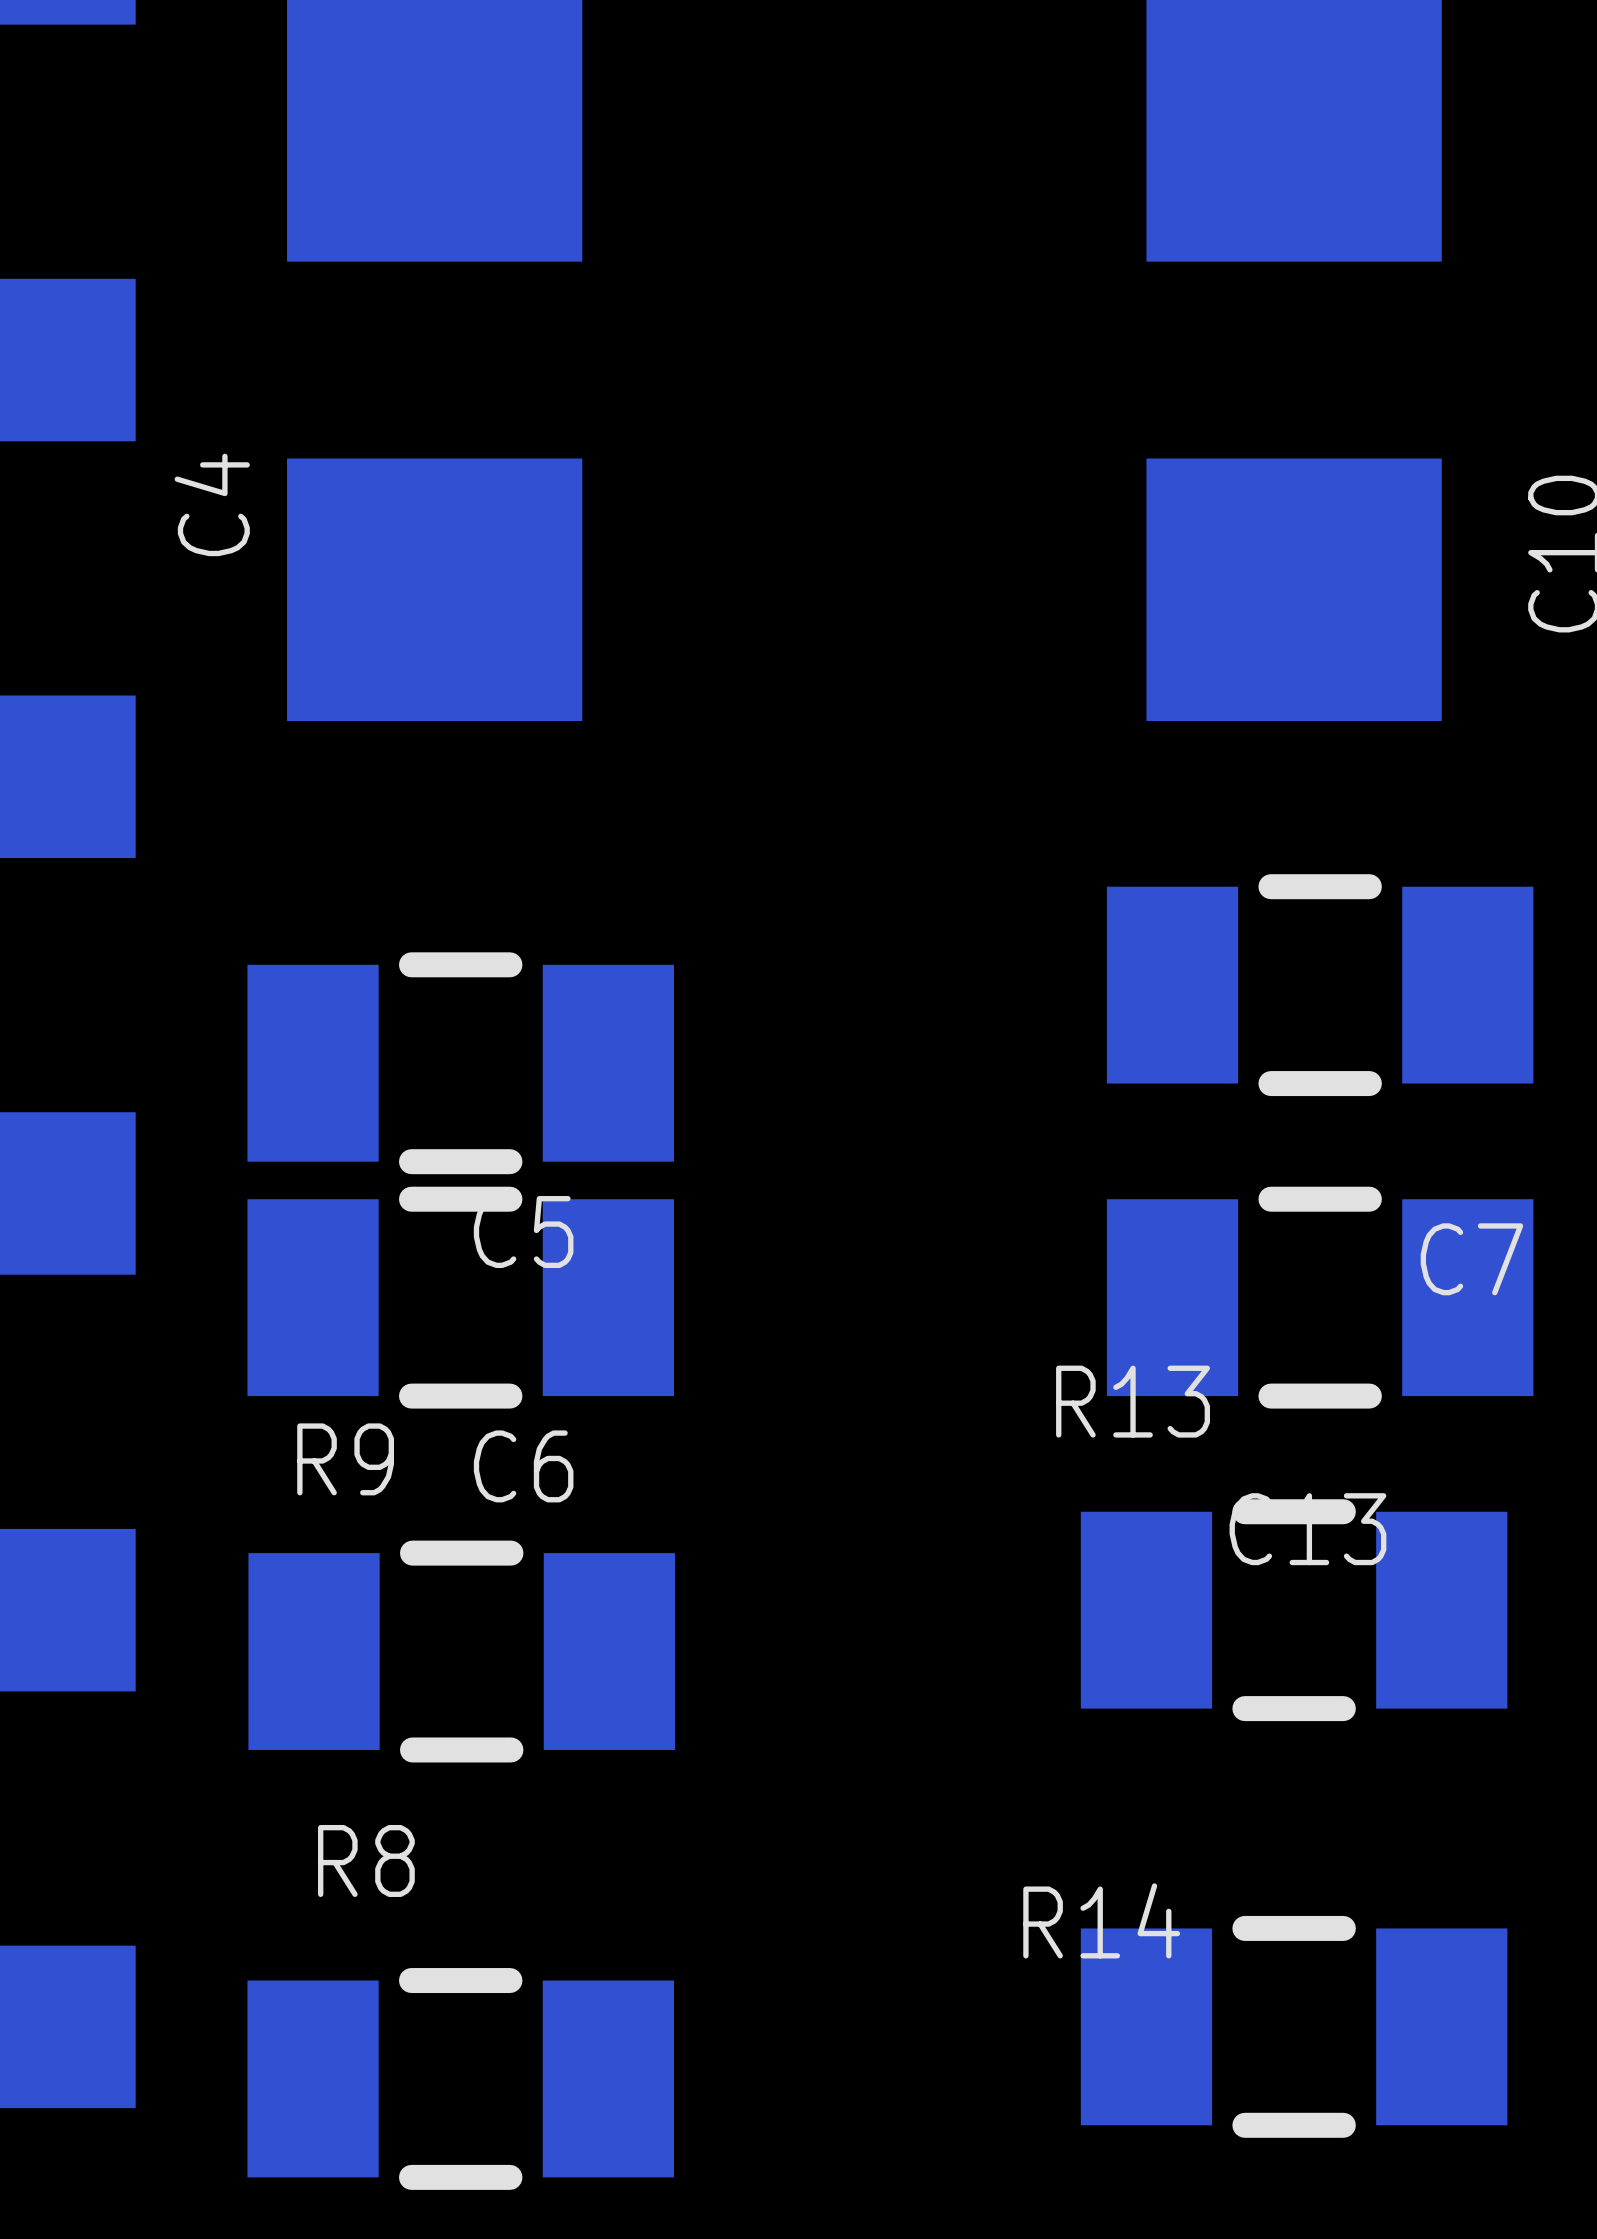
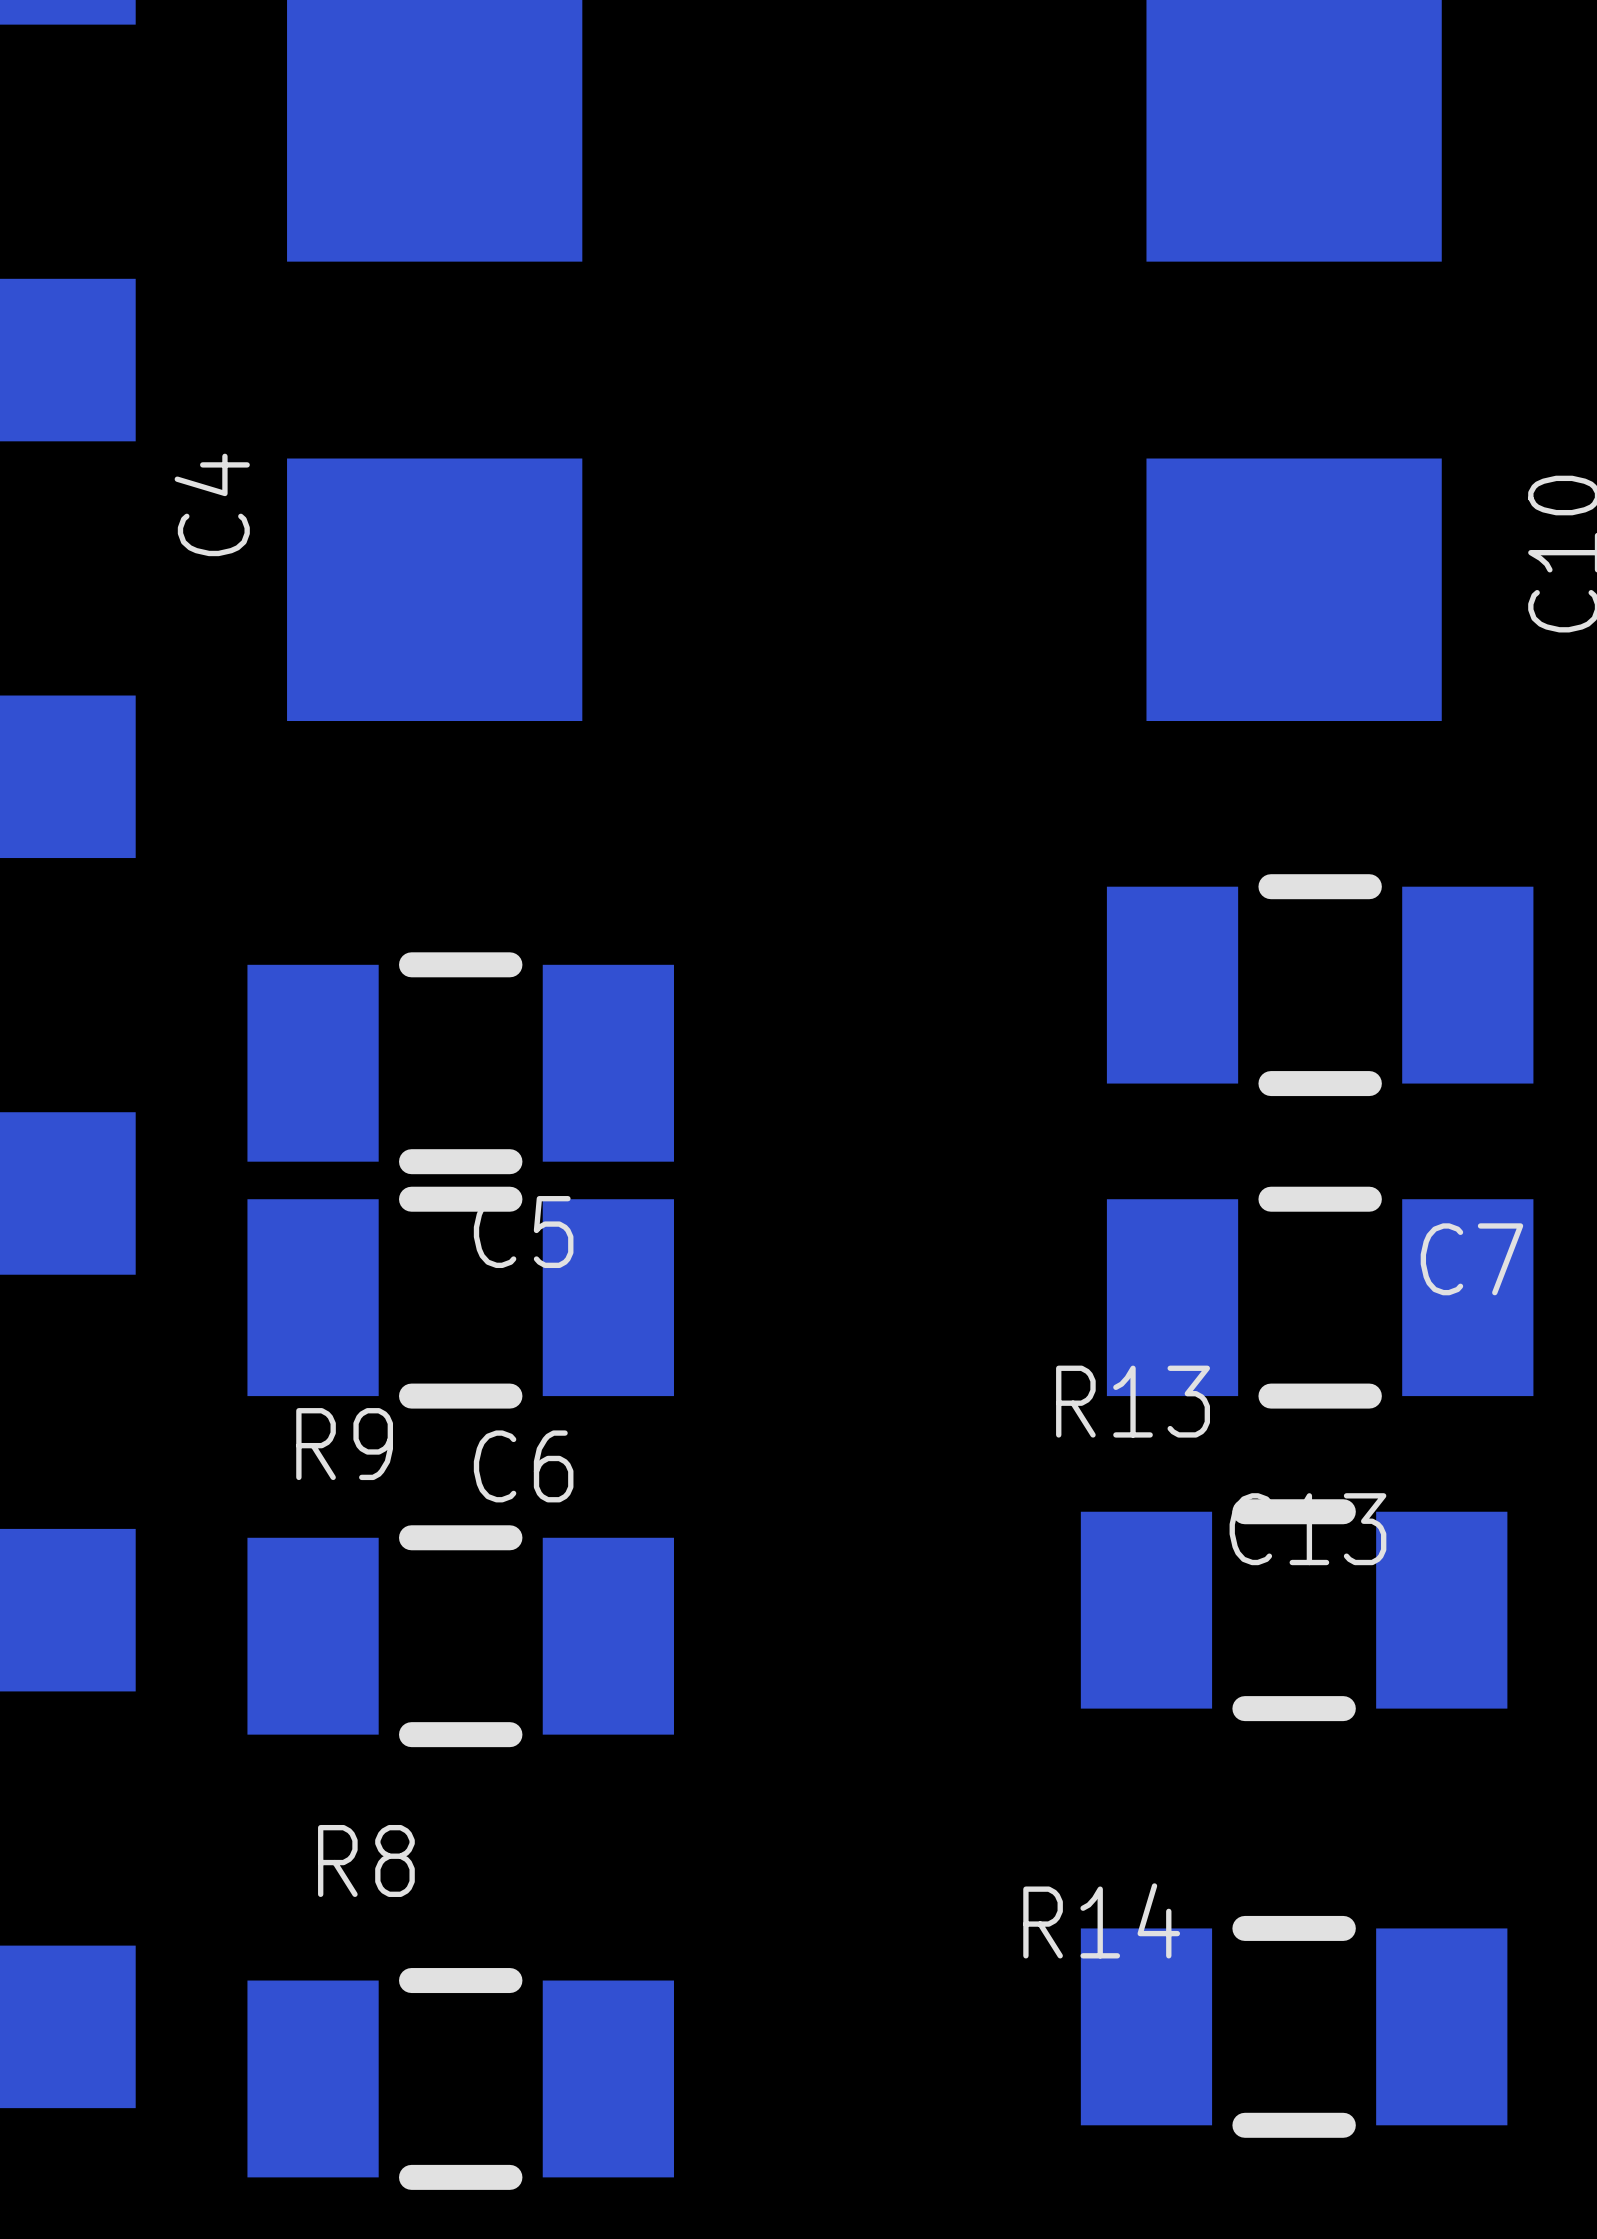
R9 position: (461, 1651) -> (460, 1636)

